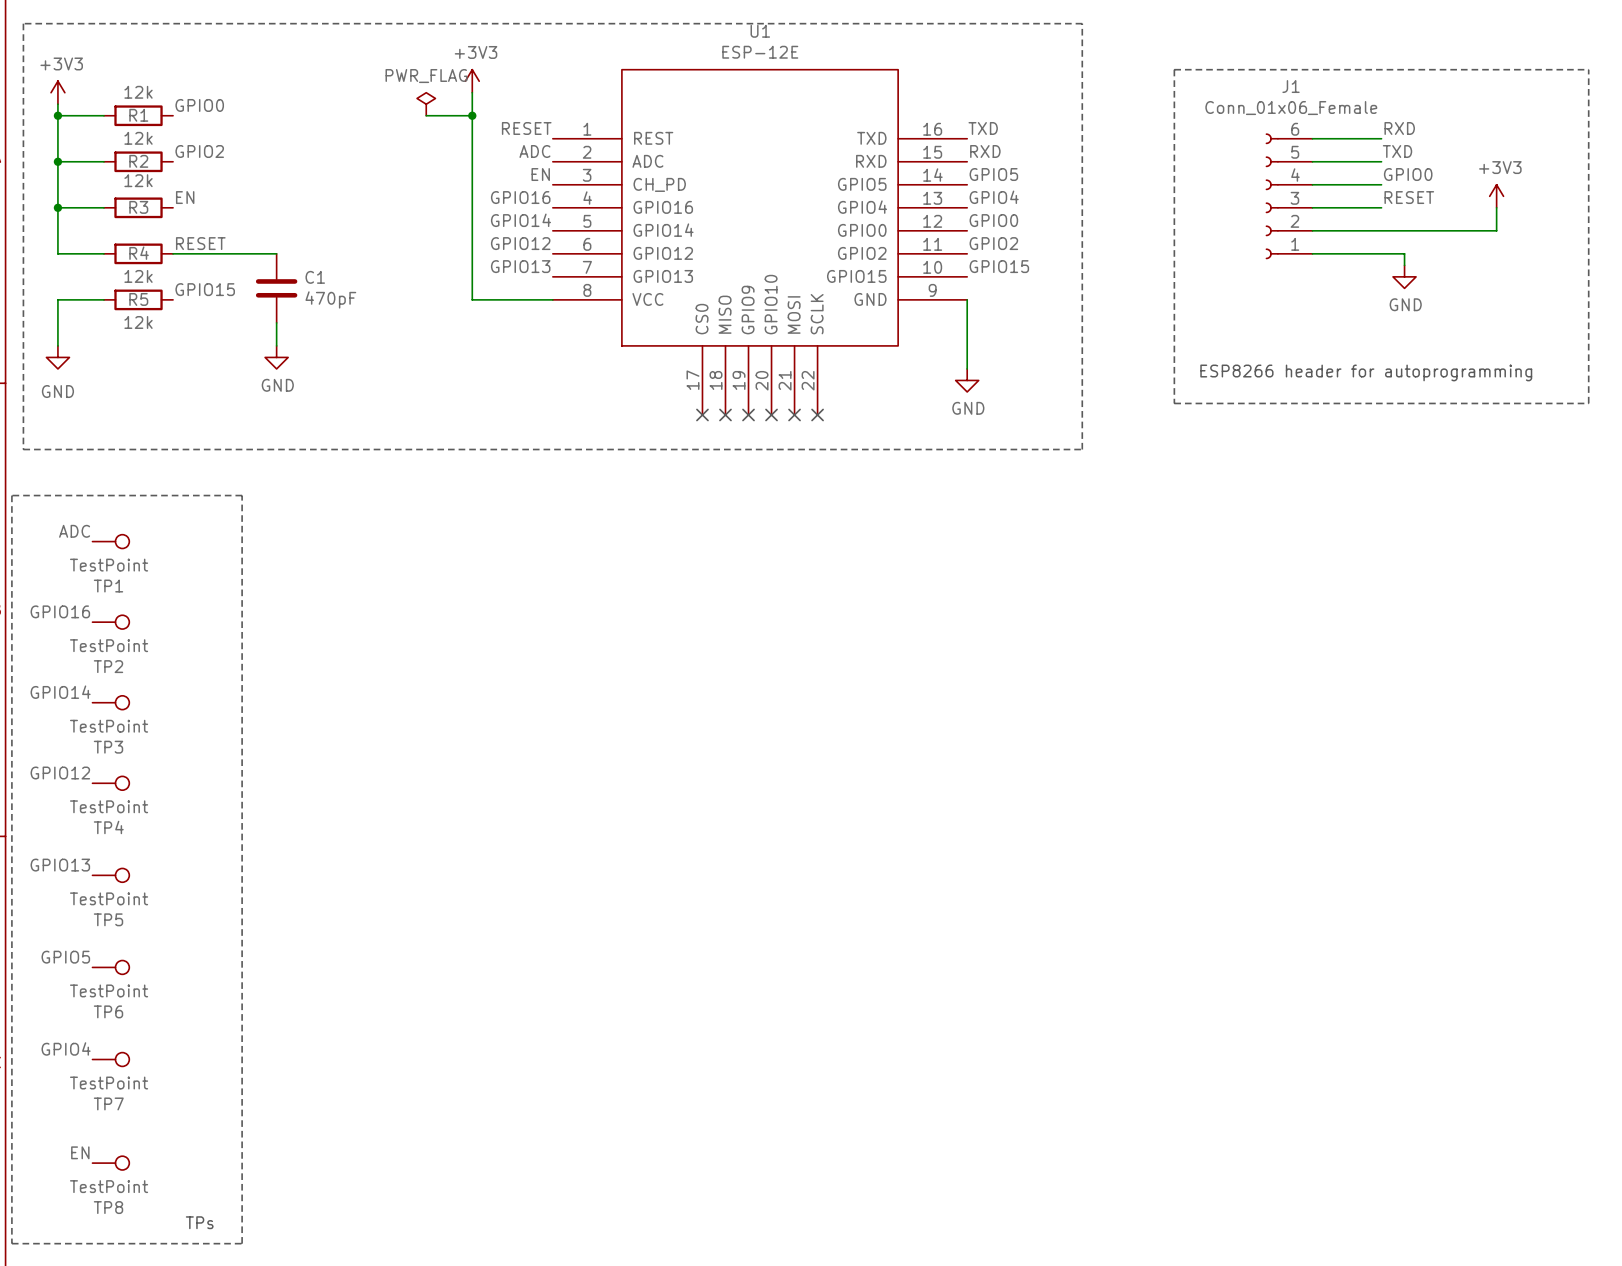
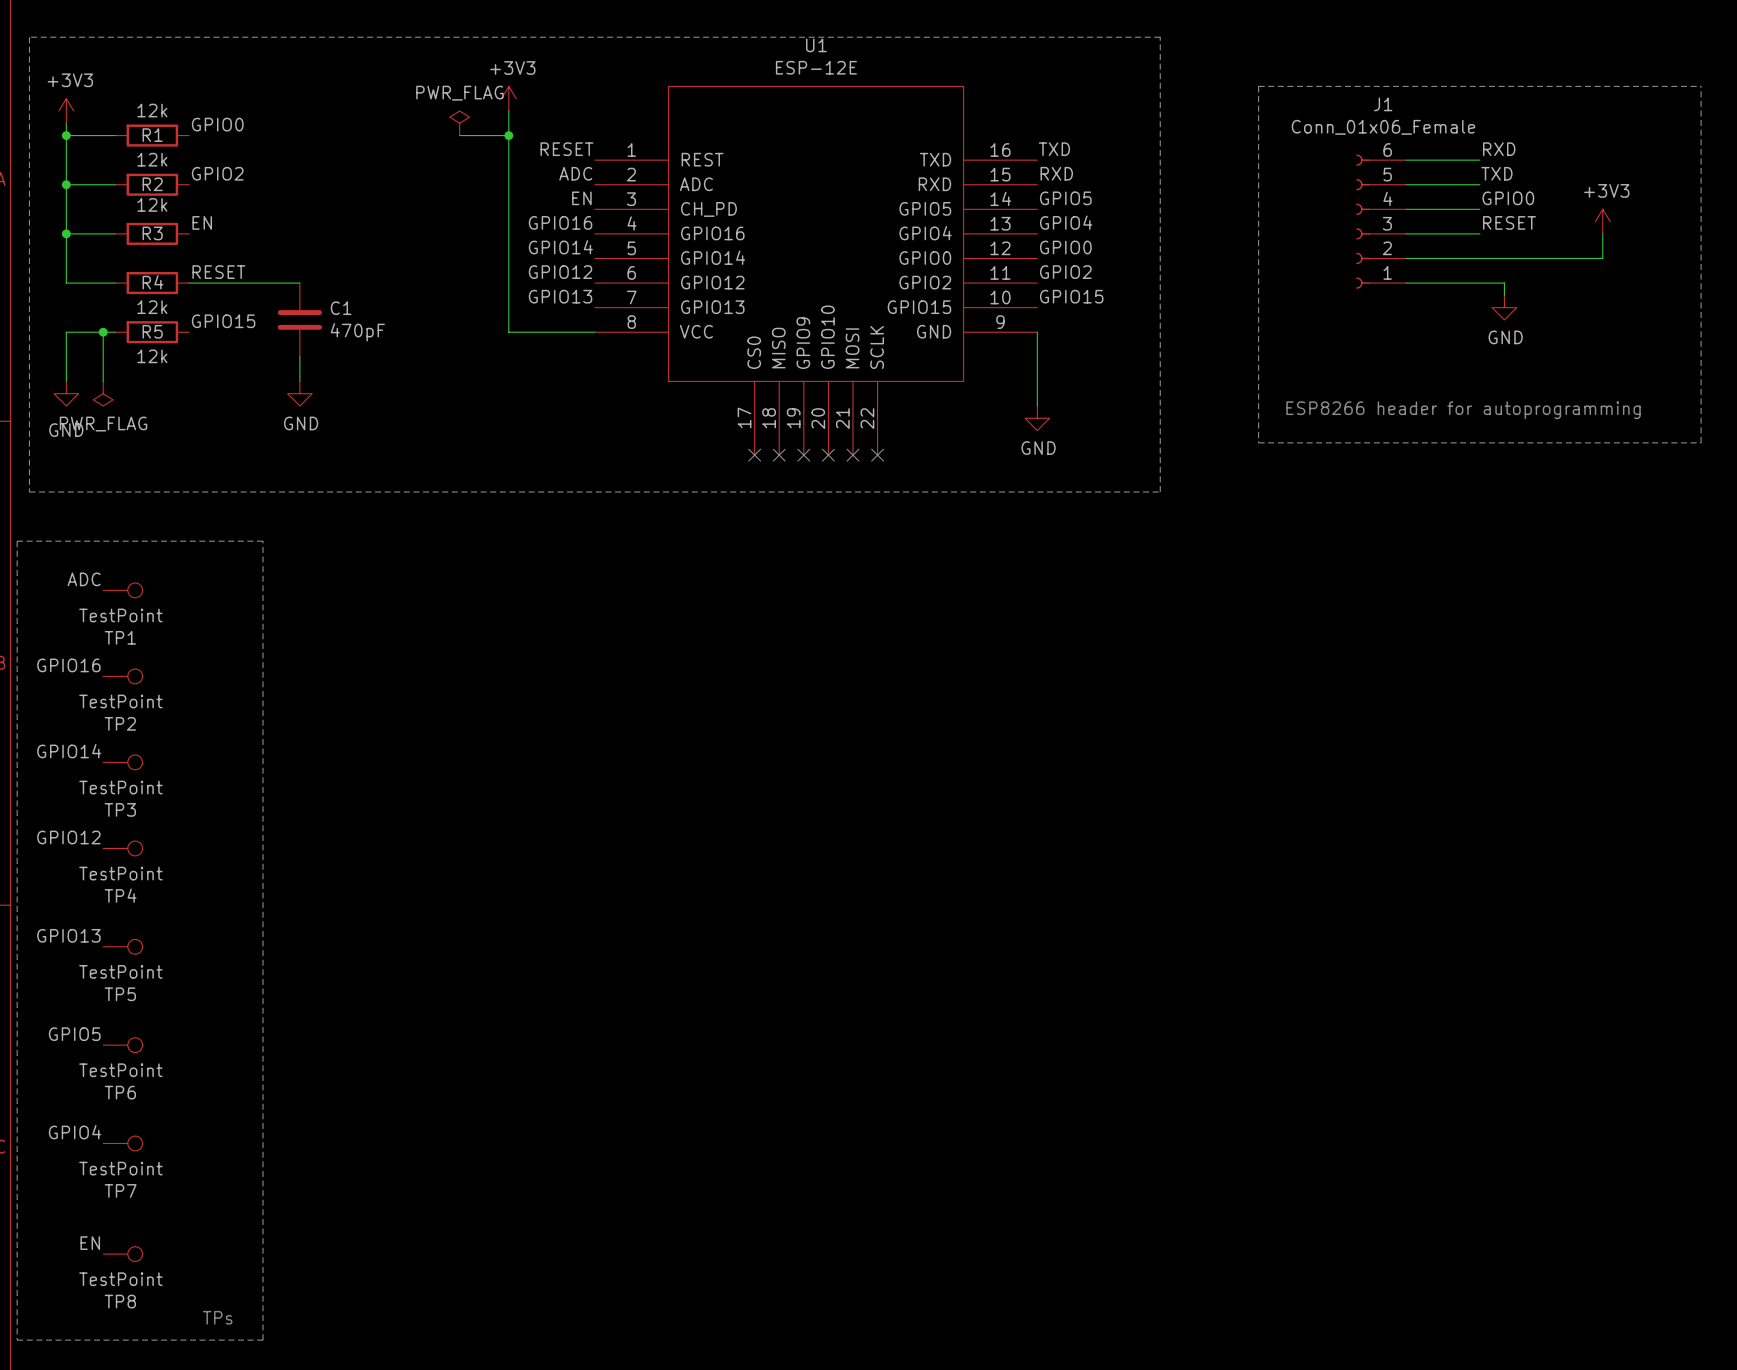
wire: none -> (103, 332) (103, 381)
junction: none -> (103, 332)
power symbol: none -> PWR_FLAG (103, 393)

